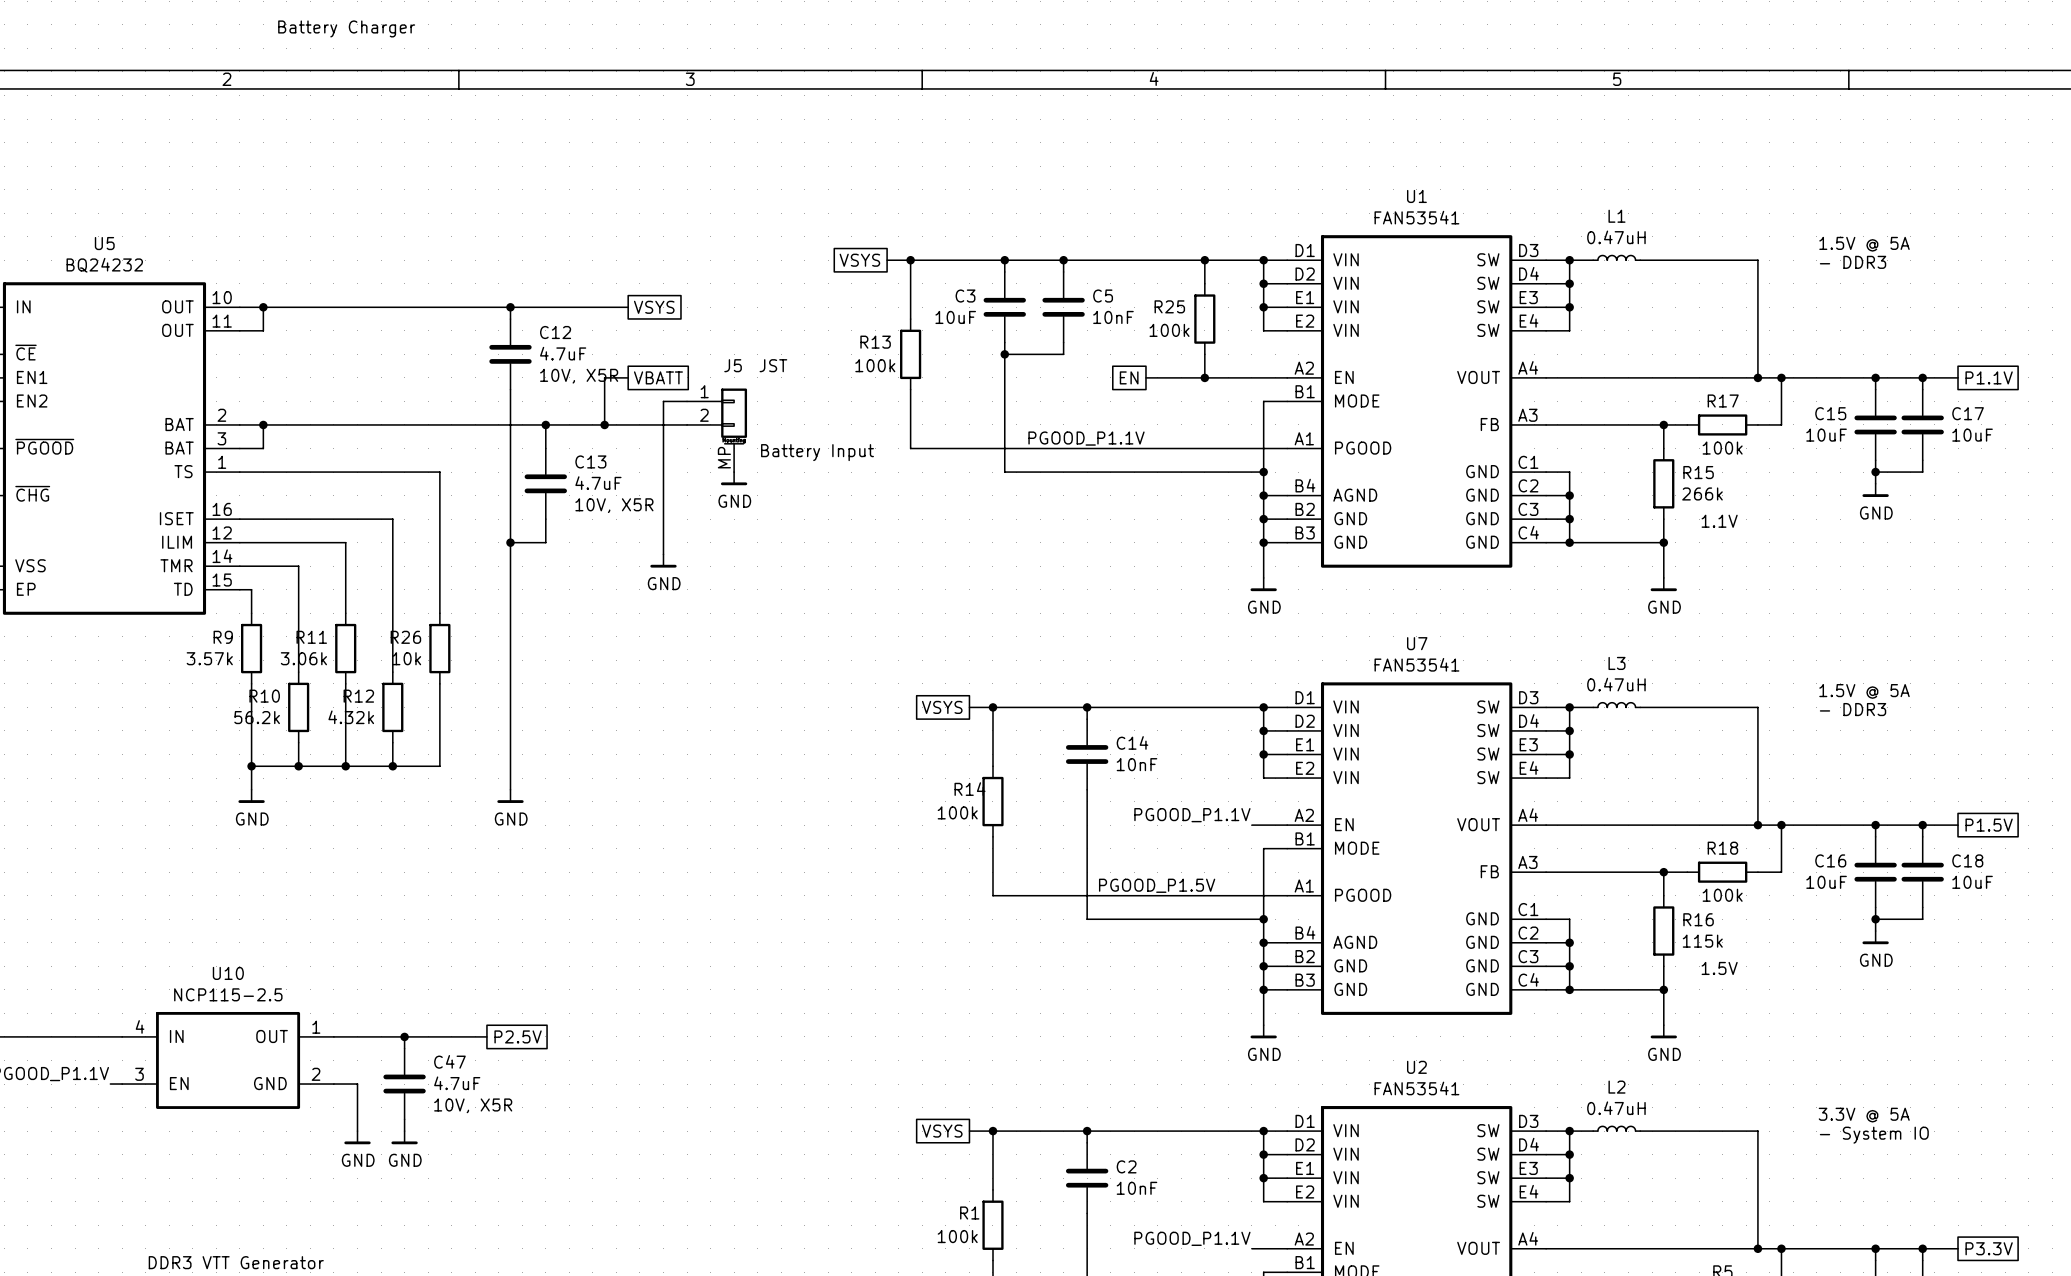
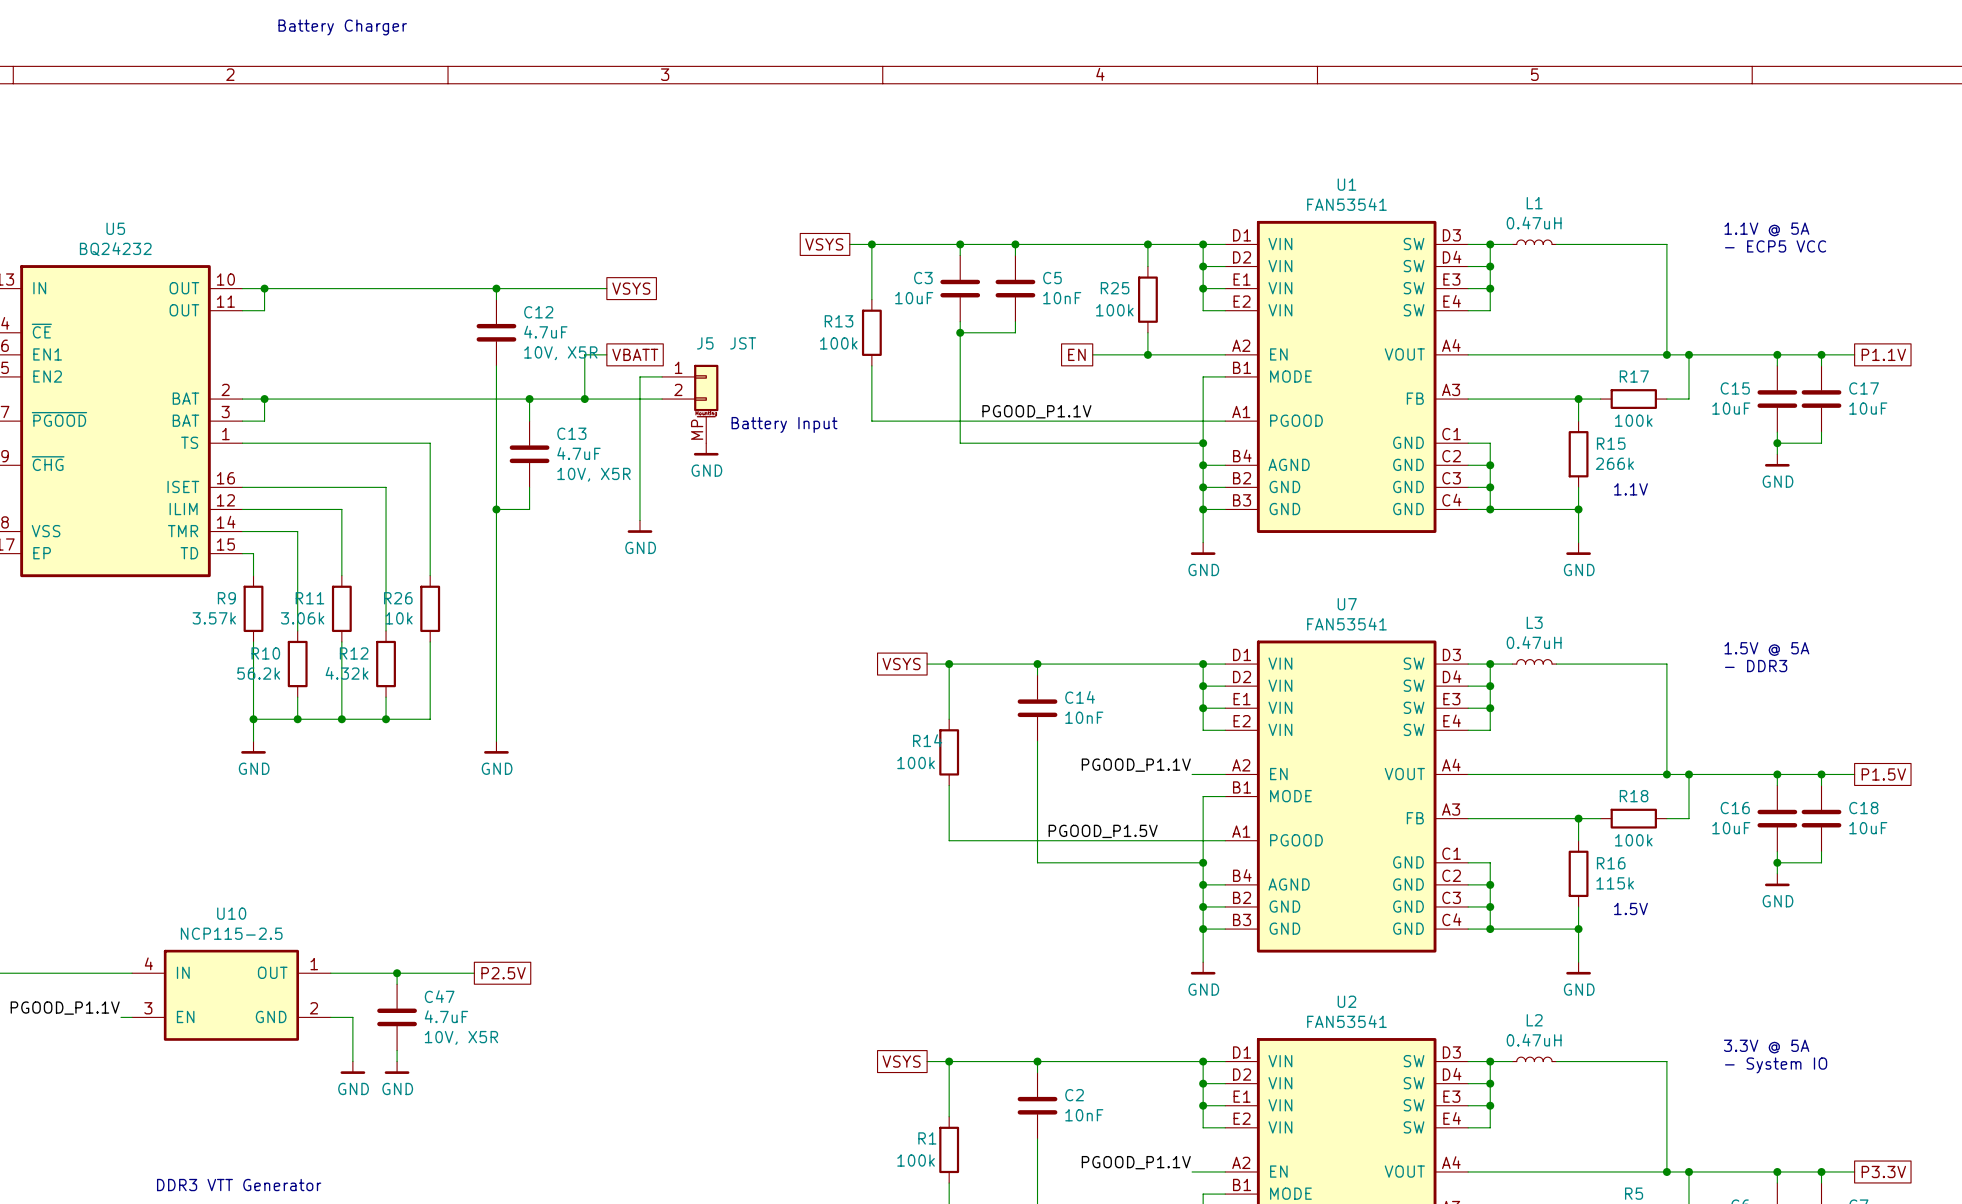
text: 1.5V @ 5A (1864, 244) -> 1.1V @ 5A (1766, 229)
text: - DDR3 (1853, 262) -> - ECP5 VCC (1775, 246)

